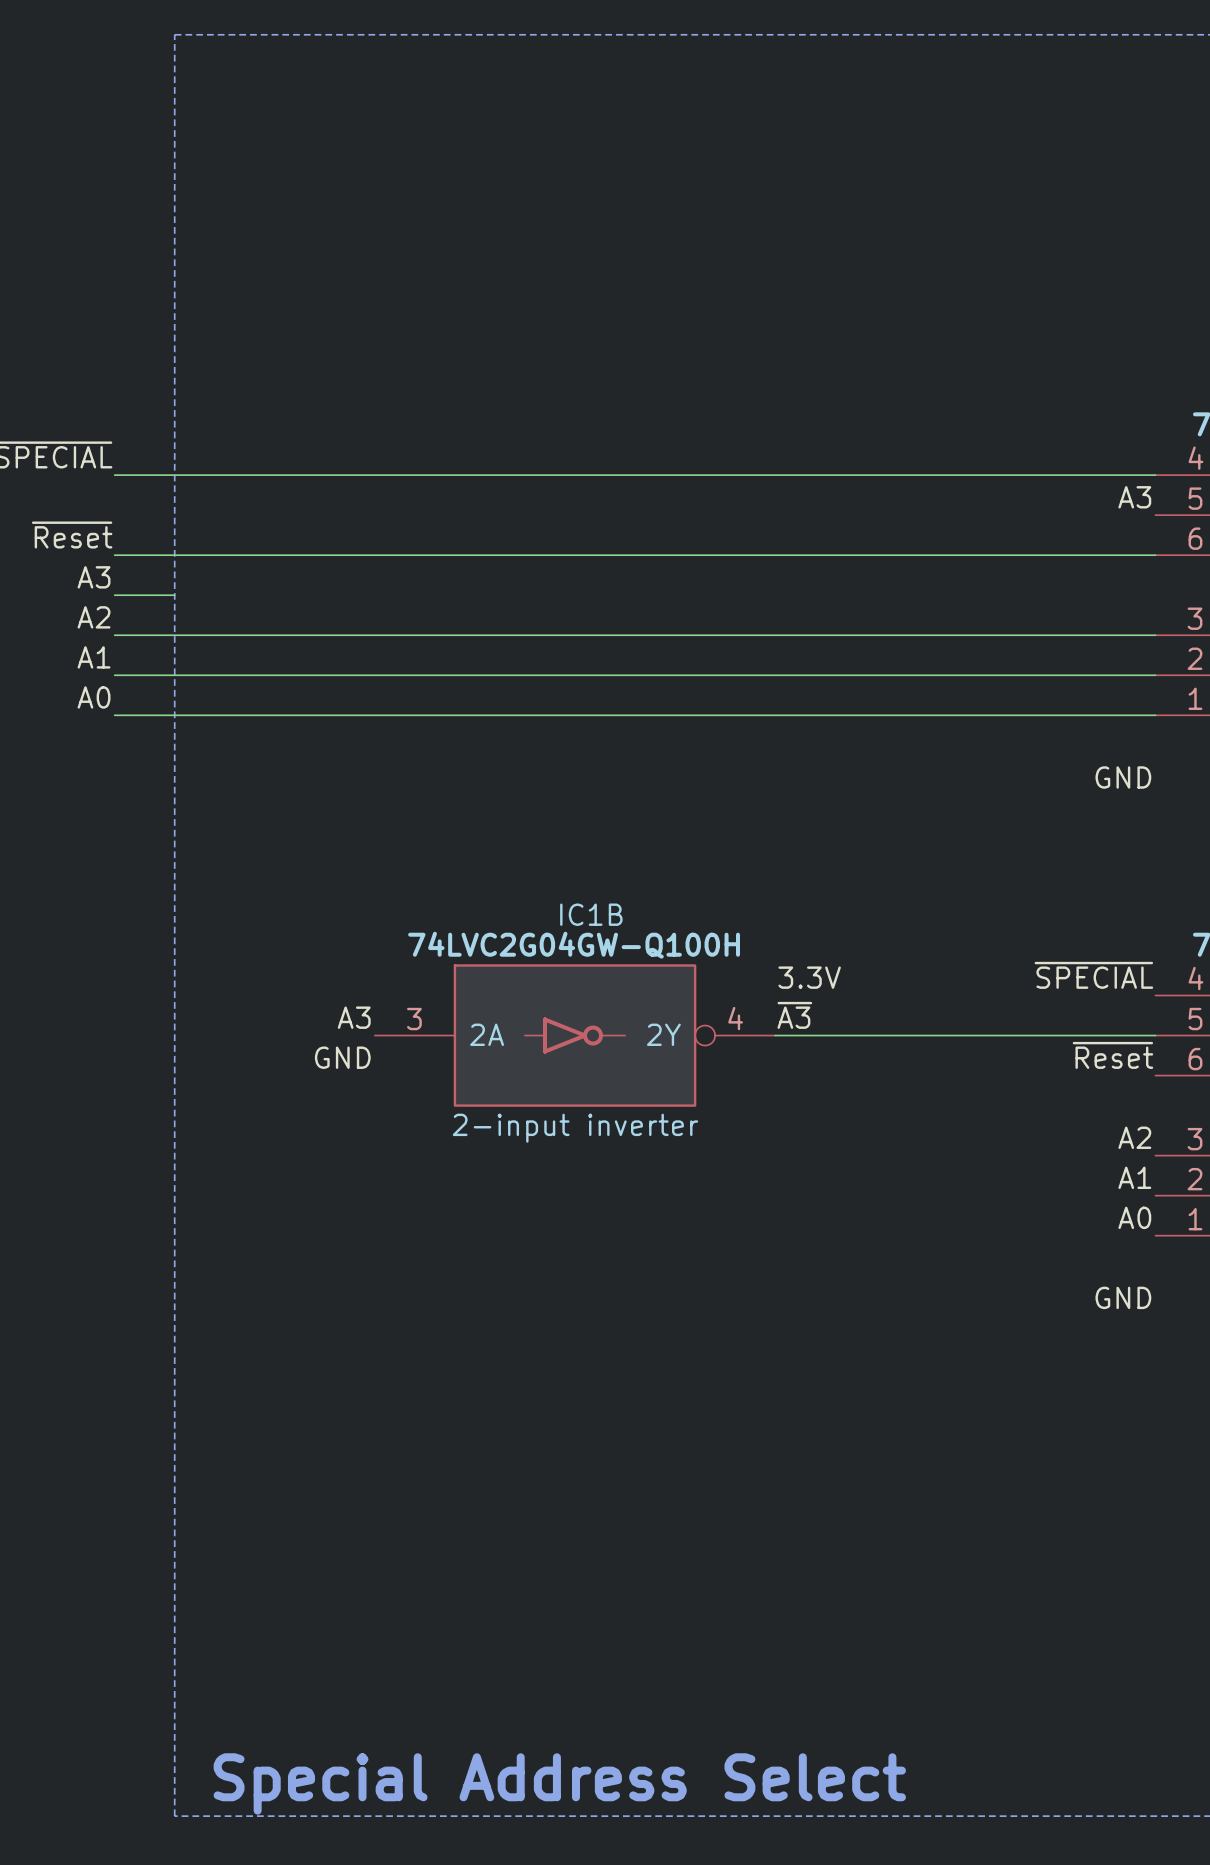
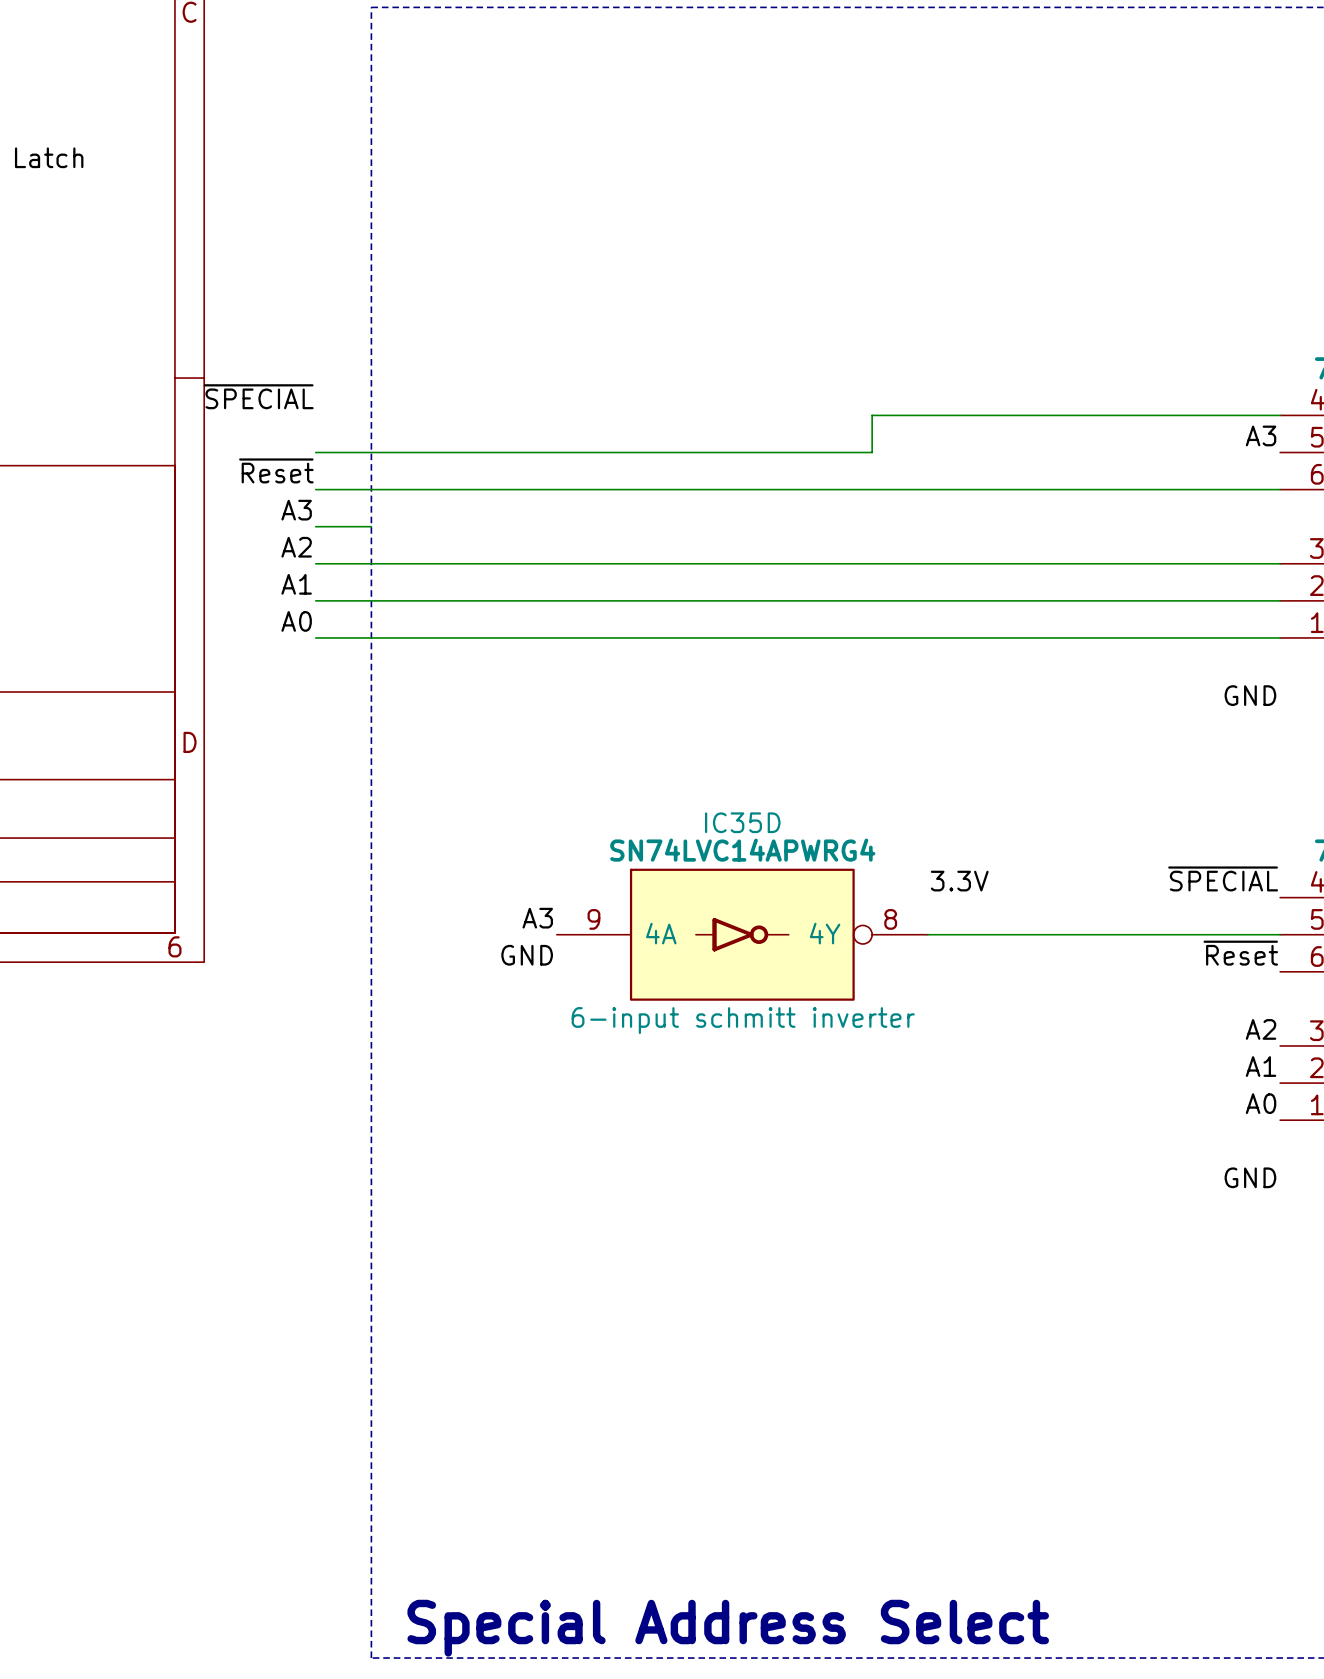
wire: (114, 475) (715, 475) -> (315, 452) (872, 452) (872, 415)
IC1B name: IC1B (591, 914) -> IC35D (742, 822)
IC1B value: 74LVC2G04GW-Q100H (574, 945) -> SN74LVC14APWRG4 (742, 850)
label: ~{A3} (794, 1015) -> none
IC1B pin number: 4 (735, 1018) -> 8 (890, 919)
IC1B pin number: 3 (414, 1019) -> 9 (593, 919)
IC1B pin name: 2A (487, 1034) -> 4A (661, 933)
IC1B pin name: 2Y (663, 1034) -> 4Y (825, 933)
IC1B text: 2-input inverter (575, 1128) -> 6-input schmitt inverter (743, 1020)

